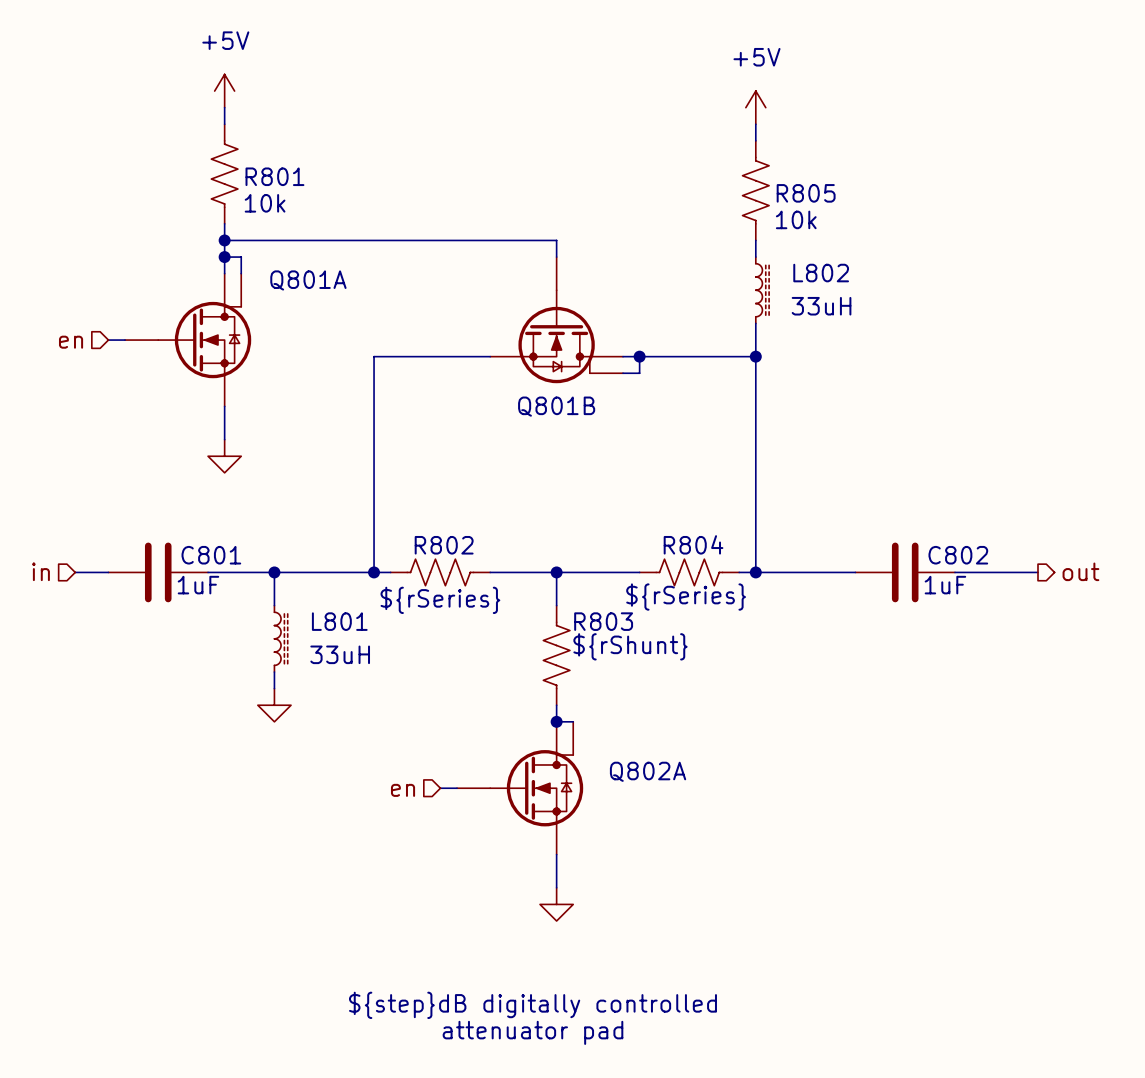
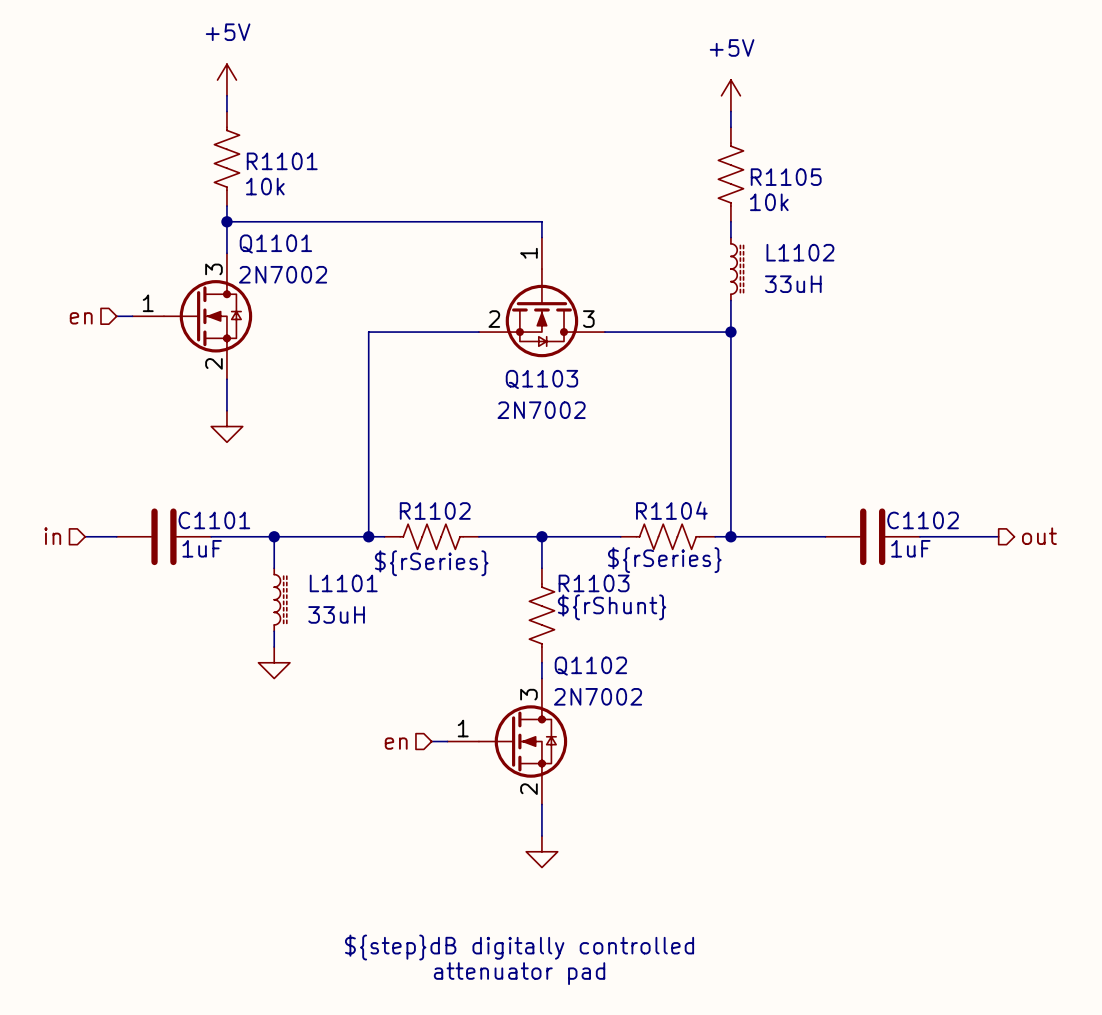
R801 name: R801 (274, 176) -> R1101 (282, 161)
R805 name: R805 (806, 193) -> R1105 (786, 177)
wire: (224, 257) (241, 257) (241, 273) -> none
junction: (224, 257) -> none
L802 name: L802 (821, 273) -> L1102 (800, 252)
Q801B: (556, 320) -> none
Q1103: none -> 2N7002 (541, 297)
Q801A: (188, 340) -> none
Q1101: none -> 2N7002 (192, 316)
wire: (639, 356) (639, 373) (623, 373) -> none
junction: (639, 356) -> none
R804 name: R804 (693, 544) -> R1104 (671, 510)
R802 name: R802 (444, 545) -> R1102 (435, 510)
C801 name: C801 (211, 555) -> C1101 (214, 520)
C802 name: C802 (958, 555) -> C1102 (923, 520)
L801 name: L801 (339, 621) -> L1101 (343, 583)
R803 name: R803 (603, 621) -> R1103 (594, 583)
wire: (556, 721) (573, 721) -> none
junction: (556, 721) -> none
Q802A: (520, 788) -> none
Q1102: none -> 2N7002 (507, 741)

